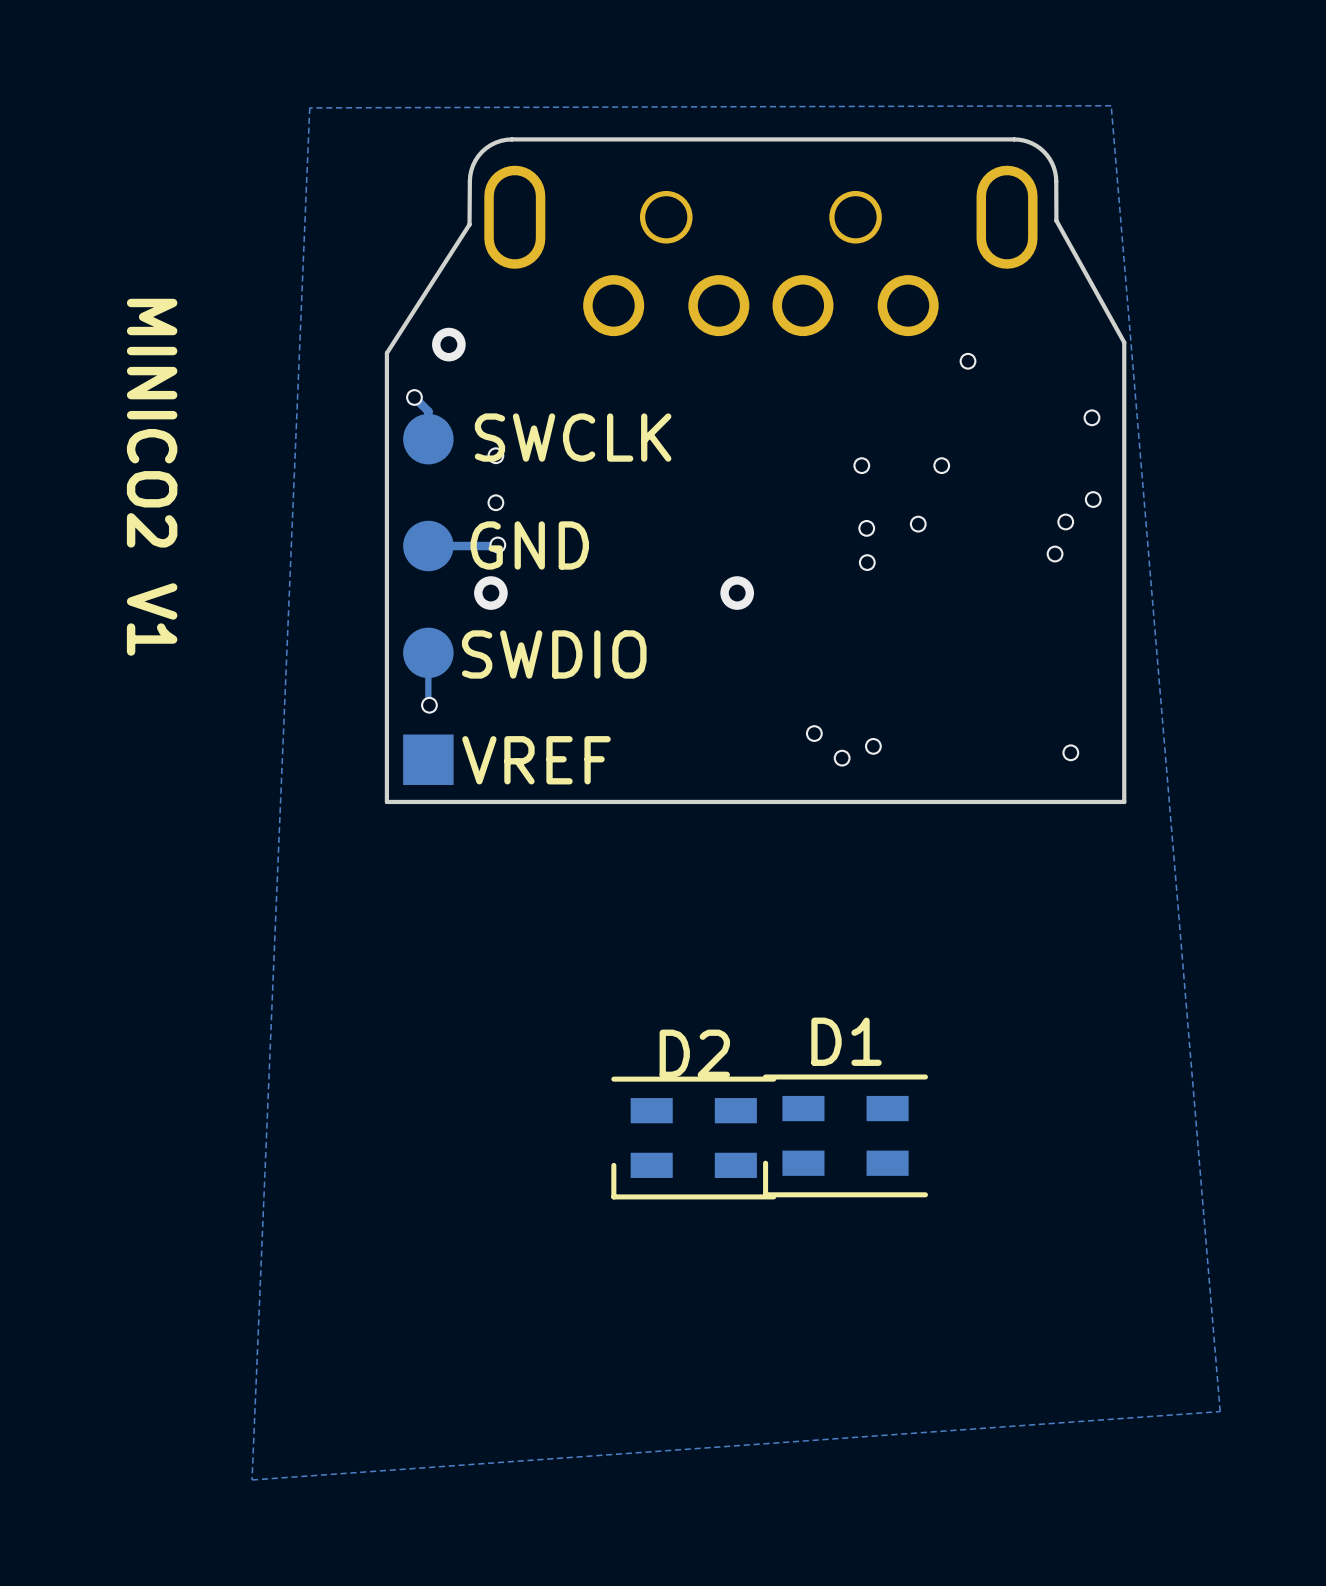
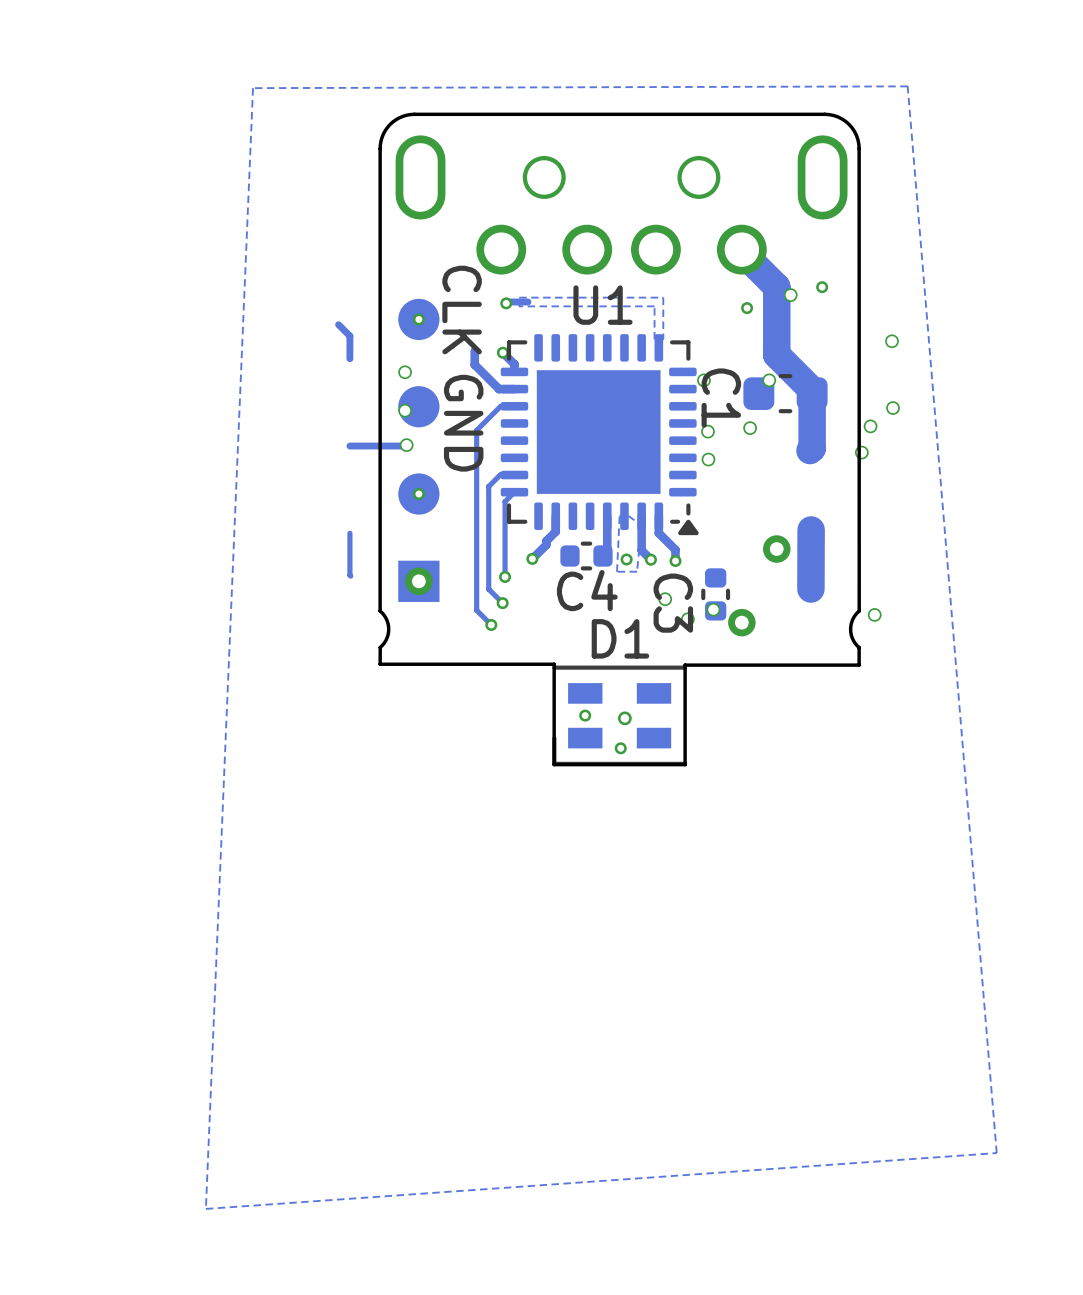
board edge: (1014, 139) (511, 139) (495, 142) (482, 151) (473, 165) (470, 175) (469, 224) (386, 353) (386, 801) (1124, 801) (1124, 342) (1056, 220) (1055, 176) (1052, 163) (1043, 151) (1036, 145) (1023, 140) (1014, 139) -> (380, 647) (380, 664) (554, 664) (554, 764) (685, 764) (685, 665) (859, 665) (859, 647) (852, 638) (850, 629) (853, 617) (859, 611) (859, 148) (856, 135) (849, 124) (837, 116) (824, 114) (414, 114) (403, 116) (390, 124) (383, 133) (380, 148) (380, 611) (385, 617) (388, 629) (385, 640) (380, 647)
track: none -> (739, 250) (776, 286) (776, 354) (812, 390) (812, 448) (809, 450)
via: (448, 344) -> none
via: none -> (822, 287)
zone outline: none -> (663, 297) (519, 297) (519, 306) (654, 306) (654, 339) (663, 339) (663, 297)
track: none -> (527, 301) (506, 303)
via: none -> (506, 303)
via: none -> (747, 308)
via: none -> (418, 319)
via: (414, 397) -> none
track: none -> (474, 350) (474, 364) (499, 389) (514, 389)
track: none -> (502, 352) (514, 364) (514, 371)
via: none -> (502, 352)
text: SWCLK (573, 437) -> CLK (462, 310)
text: MINICO2 V1 (152, 477) -> none
C1: none -> (785, 393)
track: none -> (514, 406) (500, 406) (476, 430) (476, 610) (491, 624)
U1: none -> (599, 434)
text rotation: 0° (529, 545) -> 90° clockwise (463, 423)
track: none -> (514, 475) (500, 475) (488, 486) (488, 589) (502, 603)
via position: (490, 593) -> (418, 581)
via: (737, 593) -> none
part position: (428, 599) -> (418, 450)
track: none -> (514, 492) (505, 501) (505, 576)
via: none -> (418, 494)
zone outline: none -> (628, 515) (641, 525) (637, 571) (617, 571) (619, 515) (628, 515)
track: none -> (555, 516) (555, 531) (532, 558)
track: none -> (607, 516) (607, 551)
track: none -> (641, 516) (641, 550) (650, 559)
track: none -> (658, 516) (658, 533) (675, 549) (675, 561)
track: none -> (811, 529) (810, 589)
text: SWDIO (554, 654) -> none
via: none -> (776, 549)
C4: none -> (586, 556)
via: none -> (532, 558)
via: none -> (626, 559)
via: none -> (650, 559)
via: none -> (675, 561)
via: (429, 705) -> none
via: none -> (505, 576)
C3: none -> (715, 594)
via: none -> (502, 603)
text: VREF (536, 760) -> none
via: none -> (741, 622)
via: none -> (491, 624)
via: none -> (585, 715)
via: none -> (624, 718)
via: none -> (620, 748)
D1 position: (845, 1135) -> (619, 715)
D2: (693, 1138) -> none

